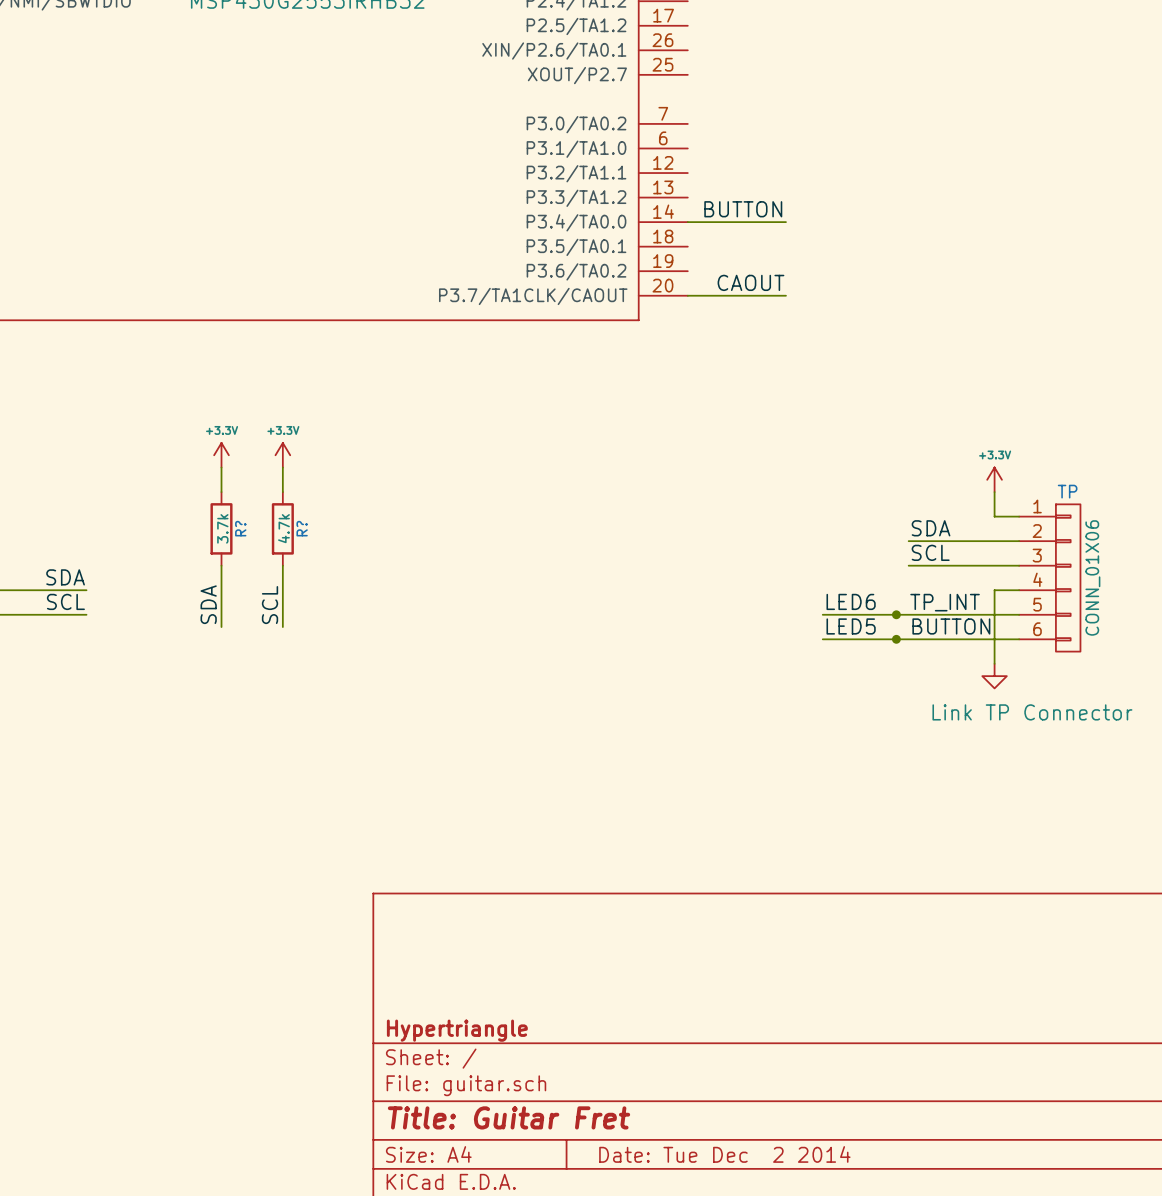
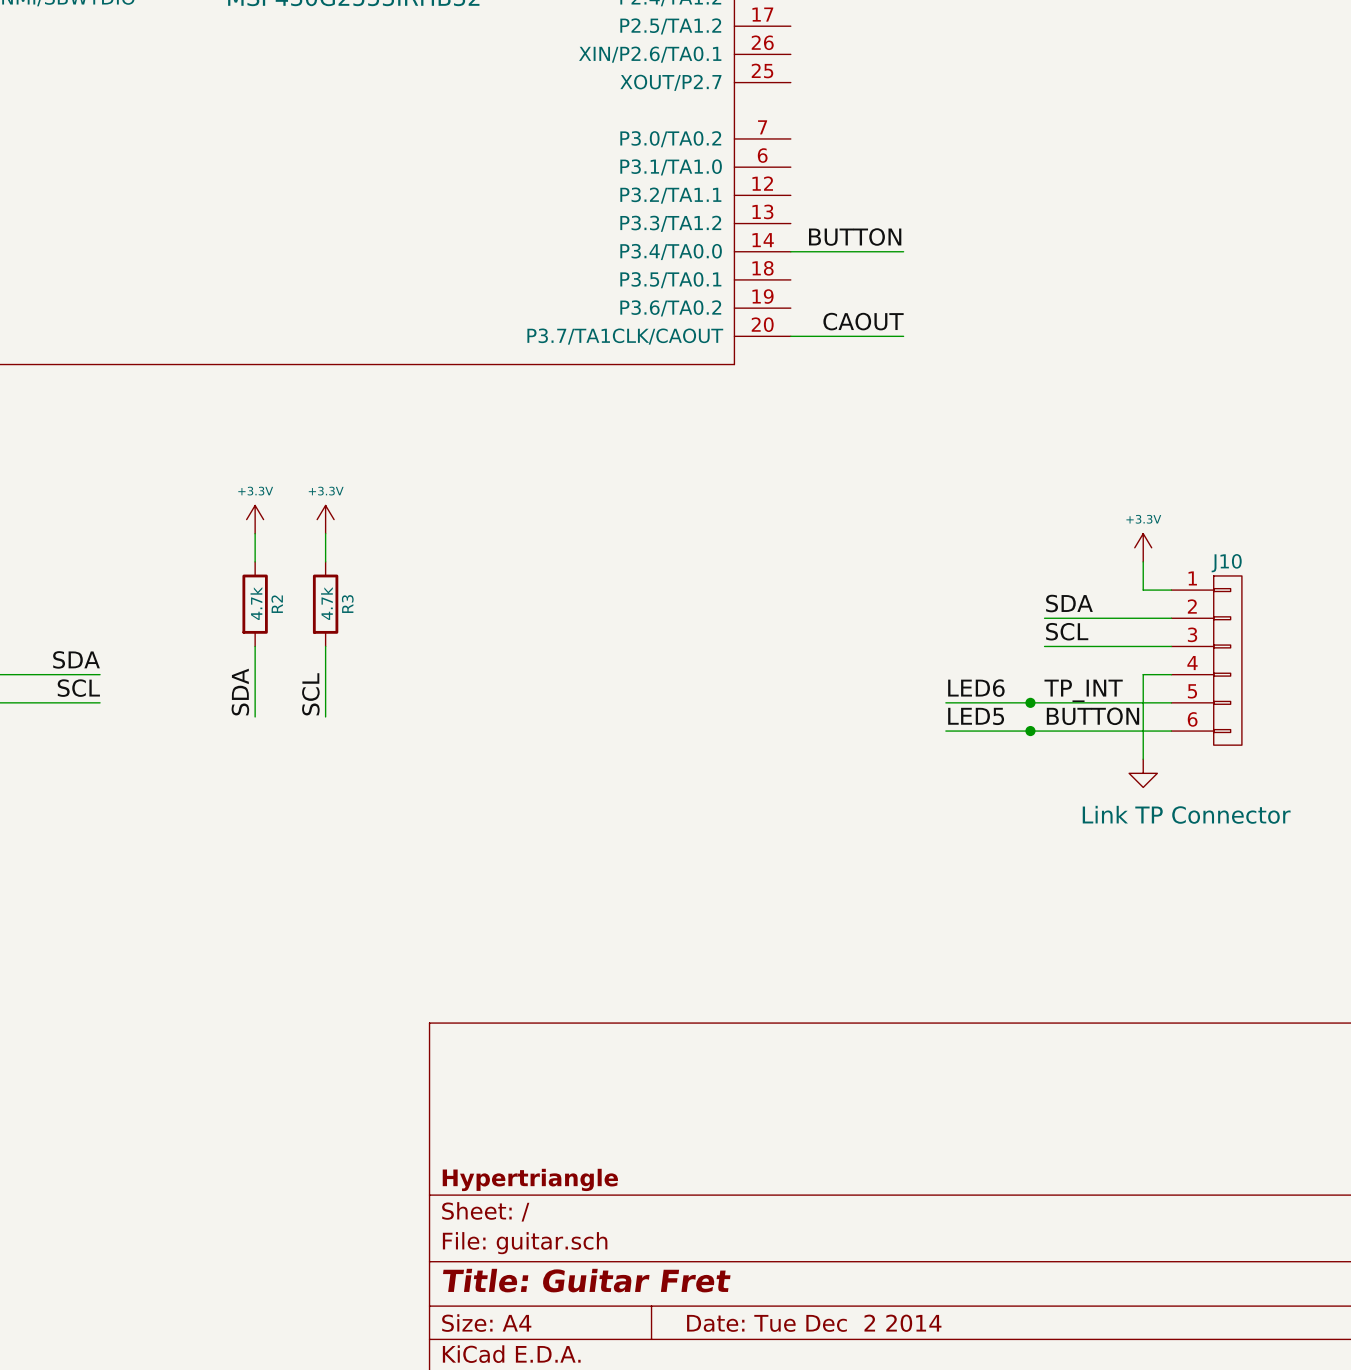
TP name: TP (1067, 491) -> J10 (1226, 563)
R? value: 3.7k (222, 528) -> 4.7k (256, 603)
R? name: R? (240, 528) -> R2 (277, 604)
R? name: R? (302, 528) -> R3 (347, 604)
TP value: CONN_01X06 (1092, 577) -> none

